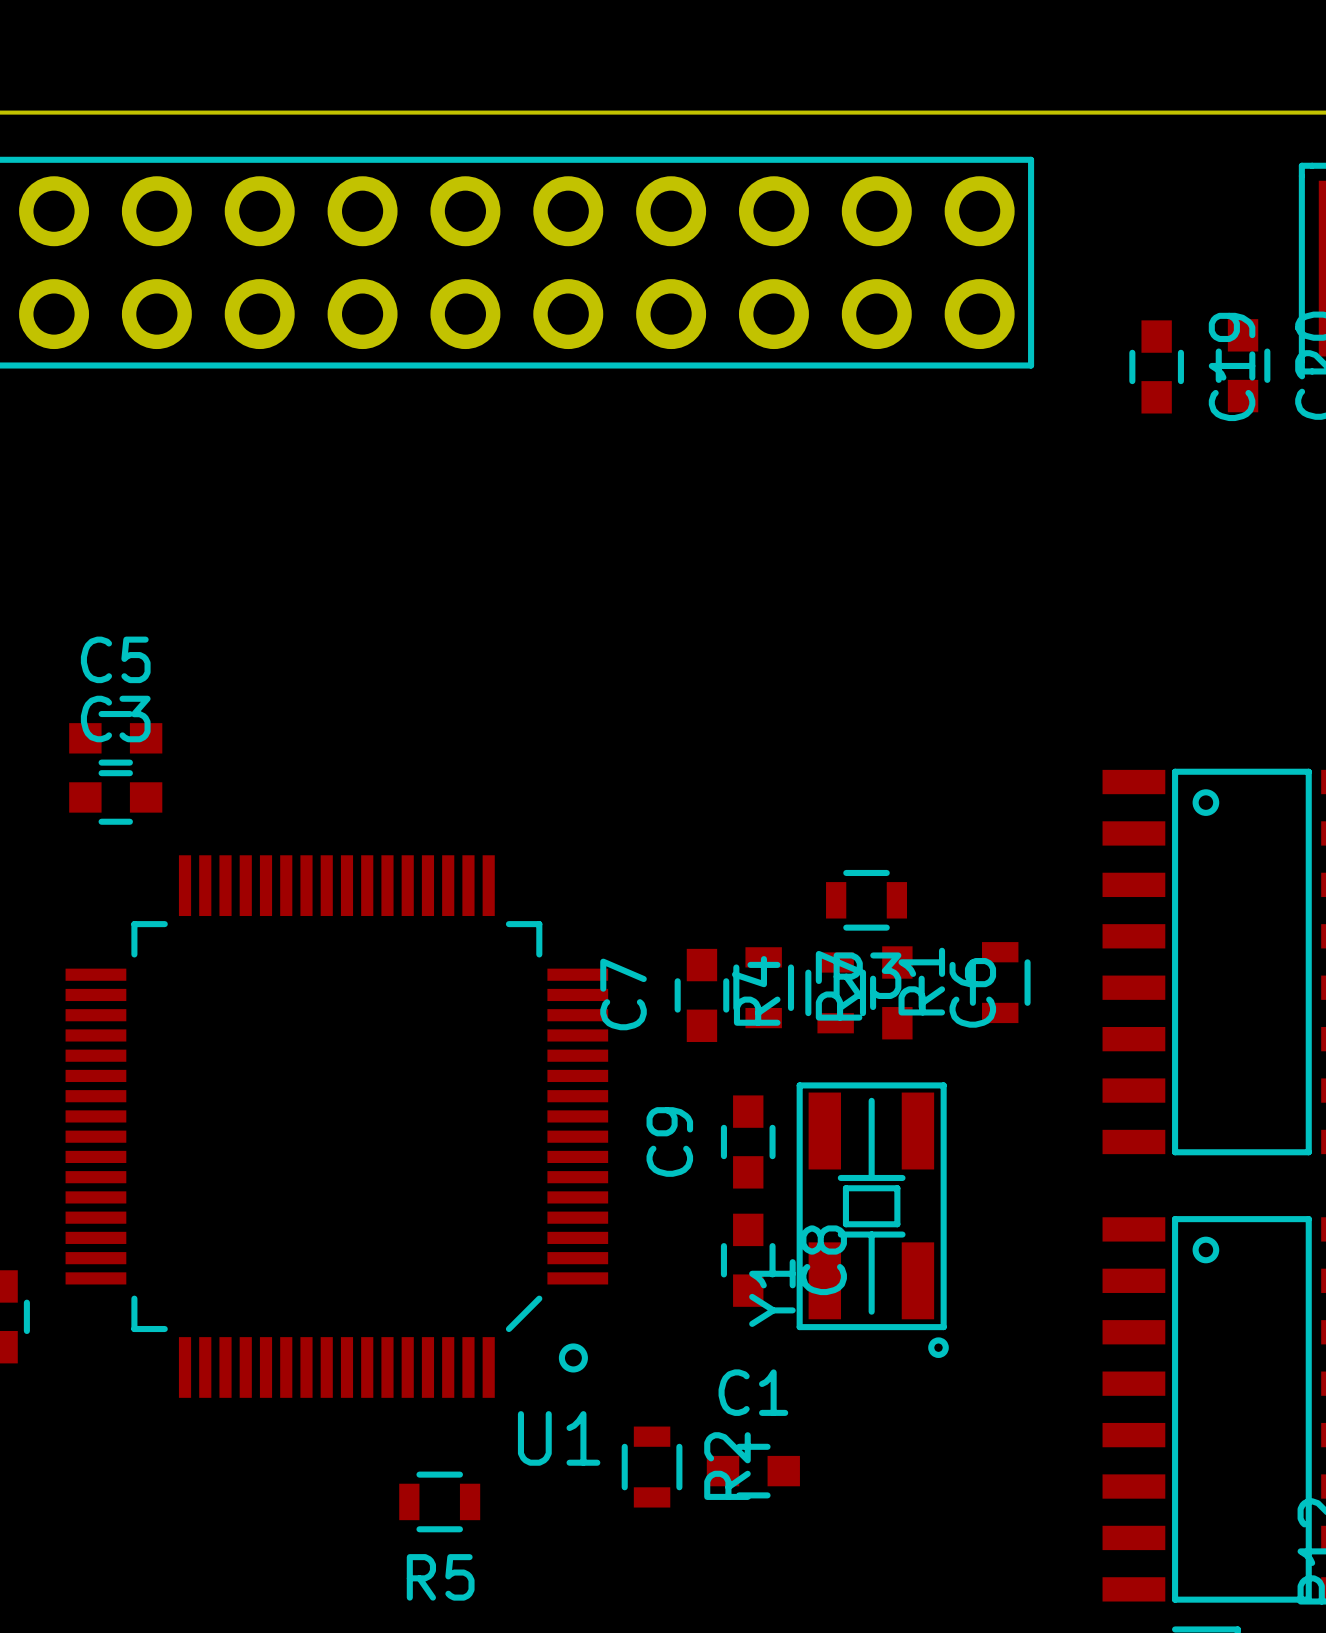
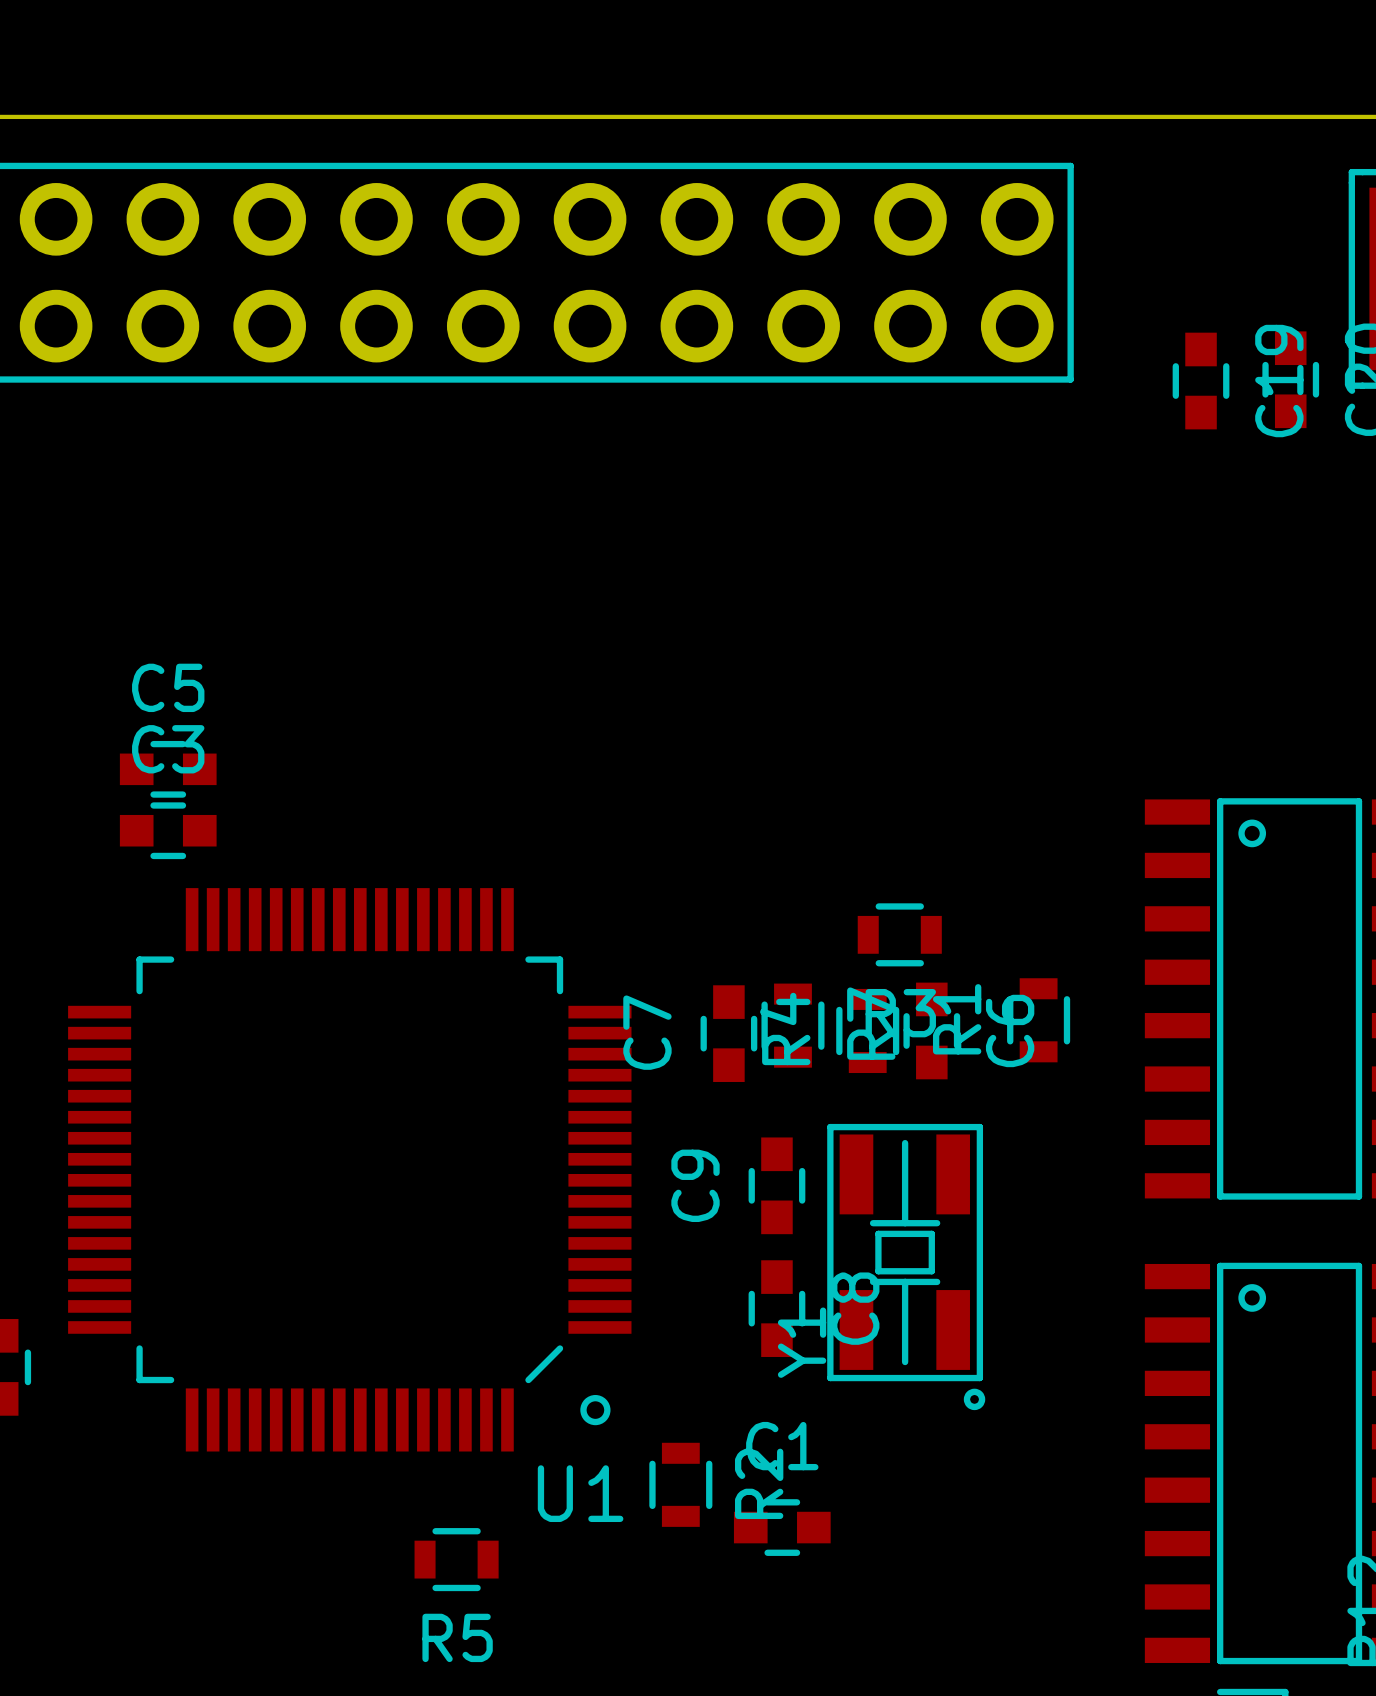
C5 position: (115, 738) -> (168, 769)
C3 position: (115, 797) -> (168, 830)
R2 position: (652, 1467) -> (680, 1484)

